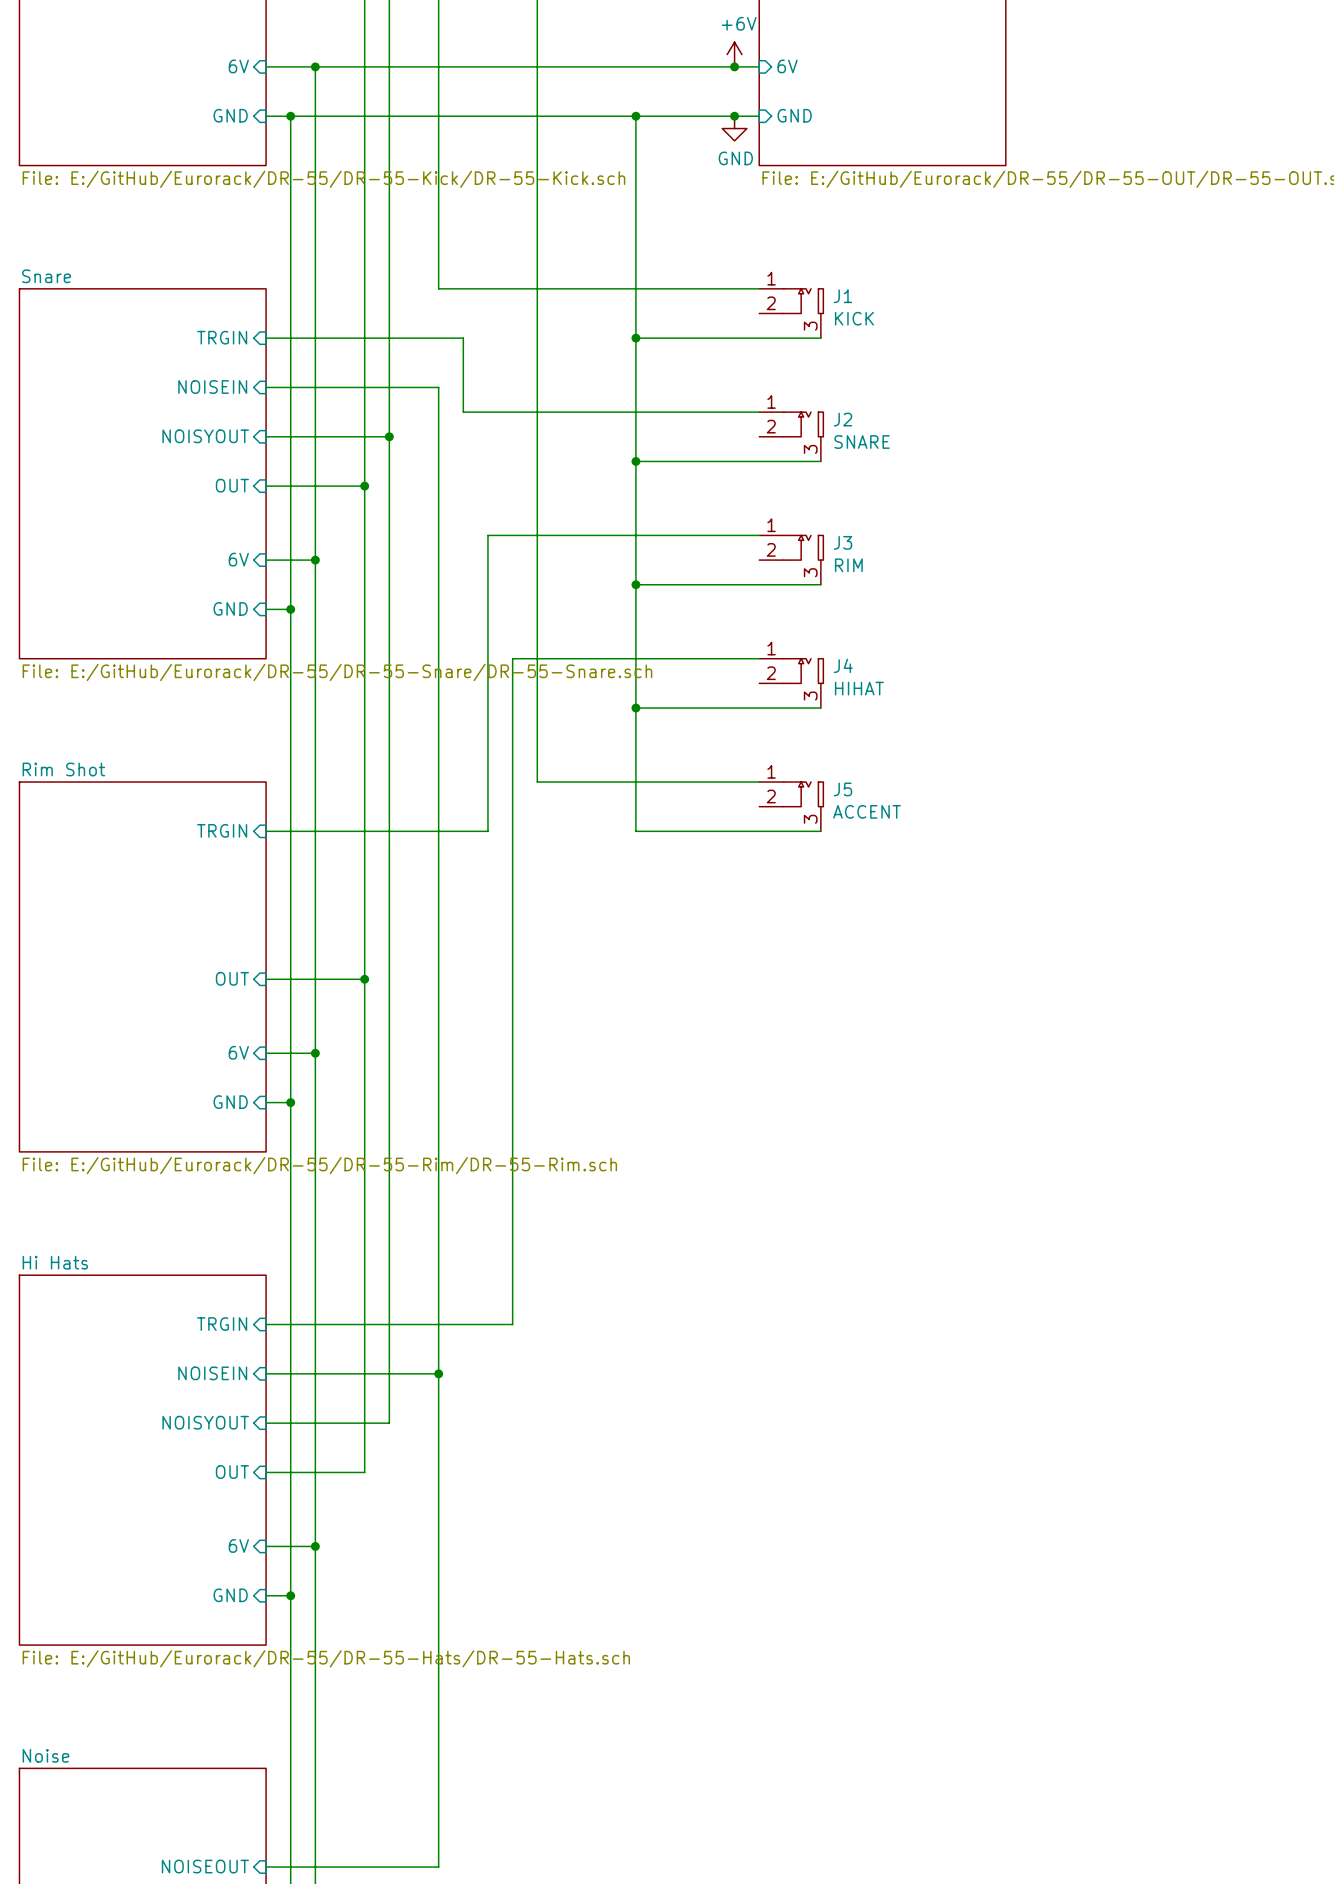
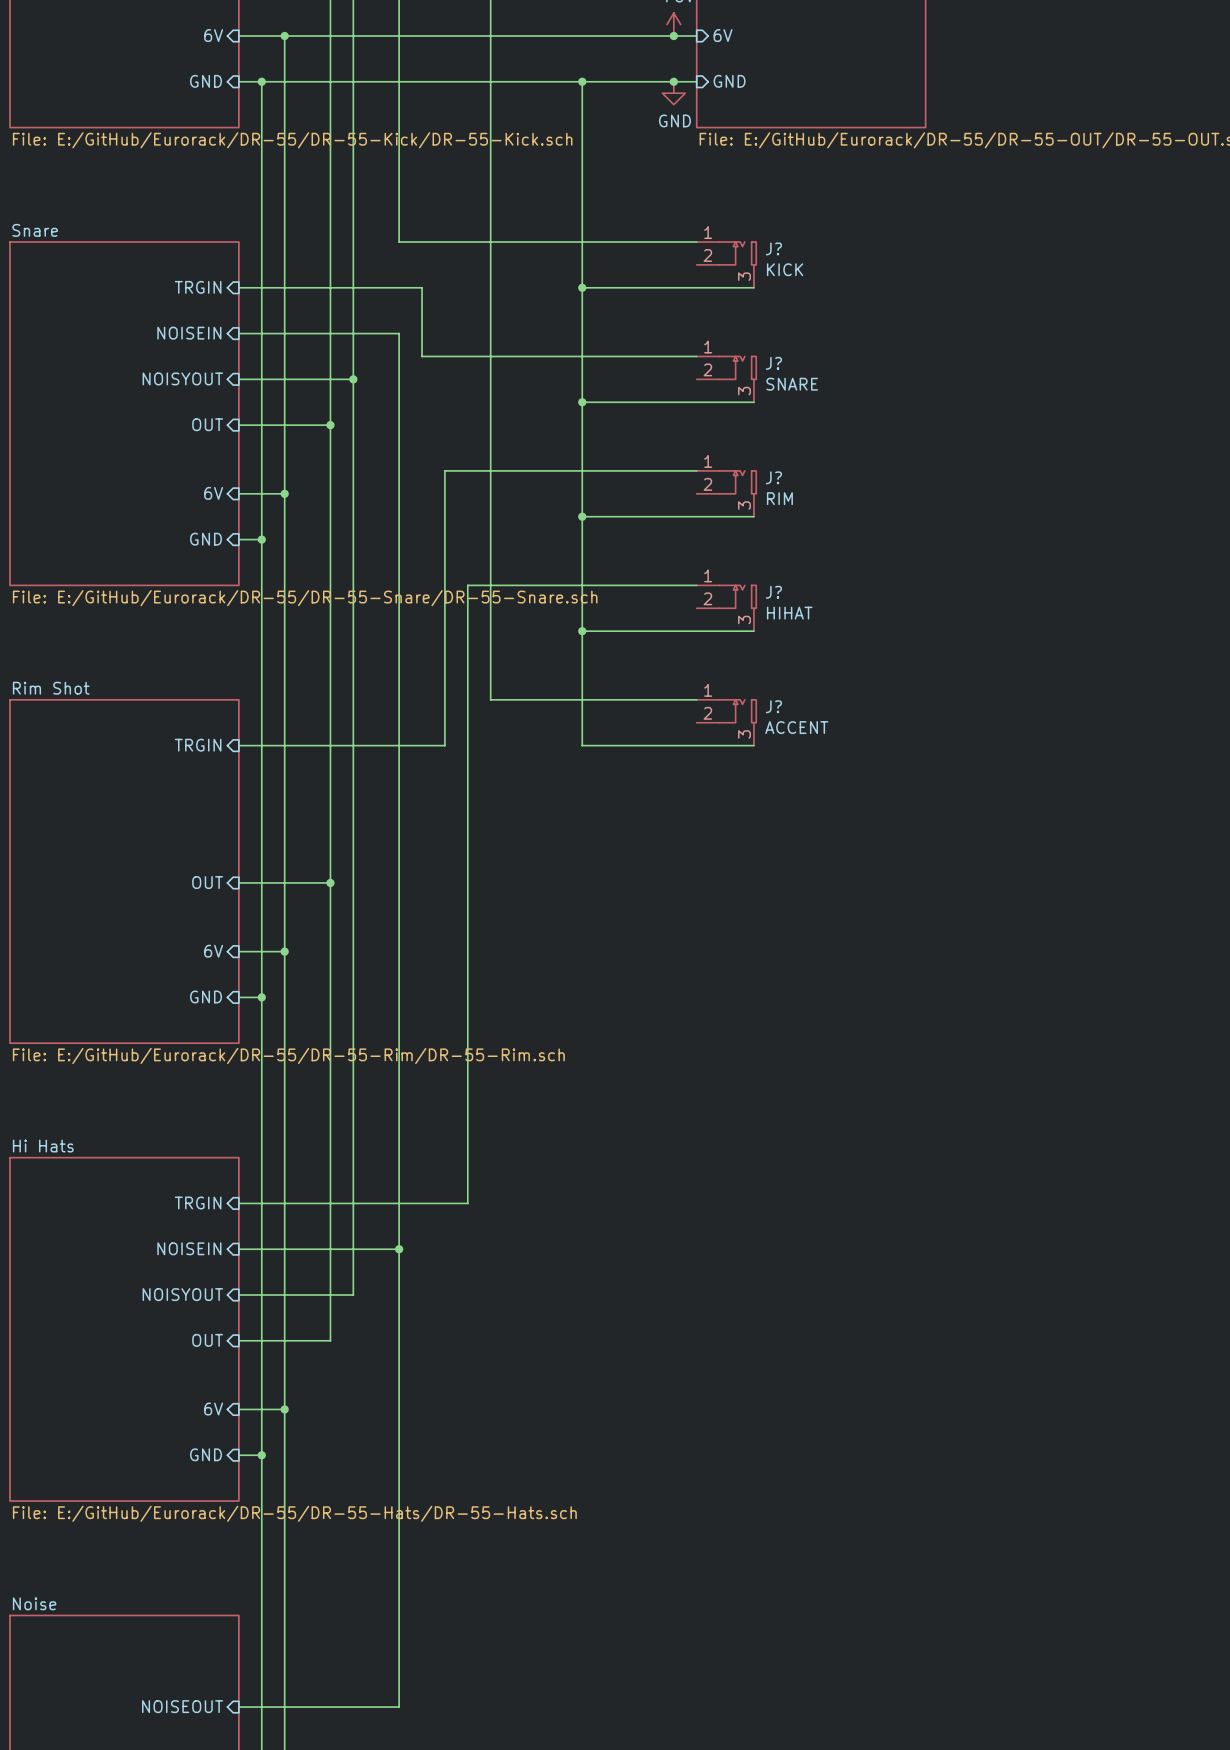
J1 name: J1 (842, 296) -> J? (773, 248)
J2 name: J2 (842, 419) -> J? (773, 363)
J3 name: J3 (842, 542) -> J? (773, 477)
J4 name: J4 (843, 665) -> J? (773, 592)
J5 name: J5 (842, 789) -> J? (773, 706)

